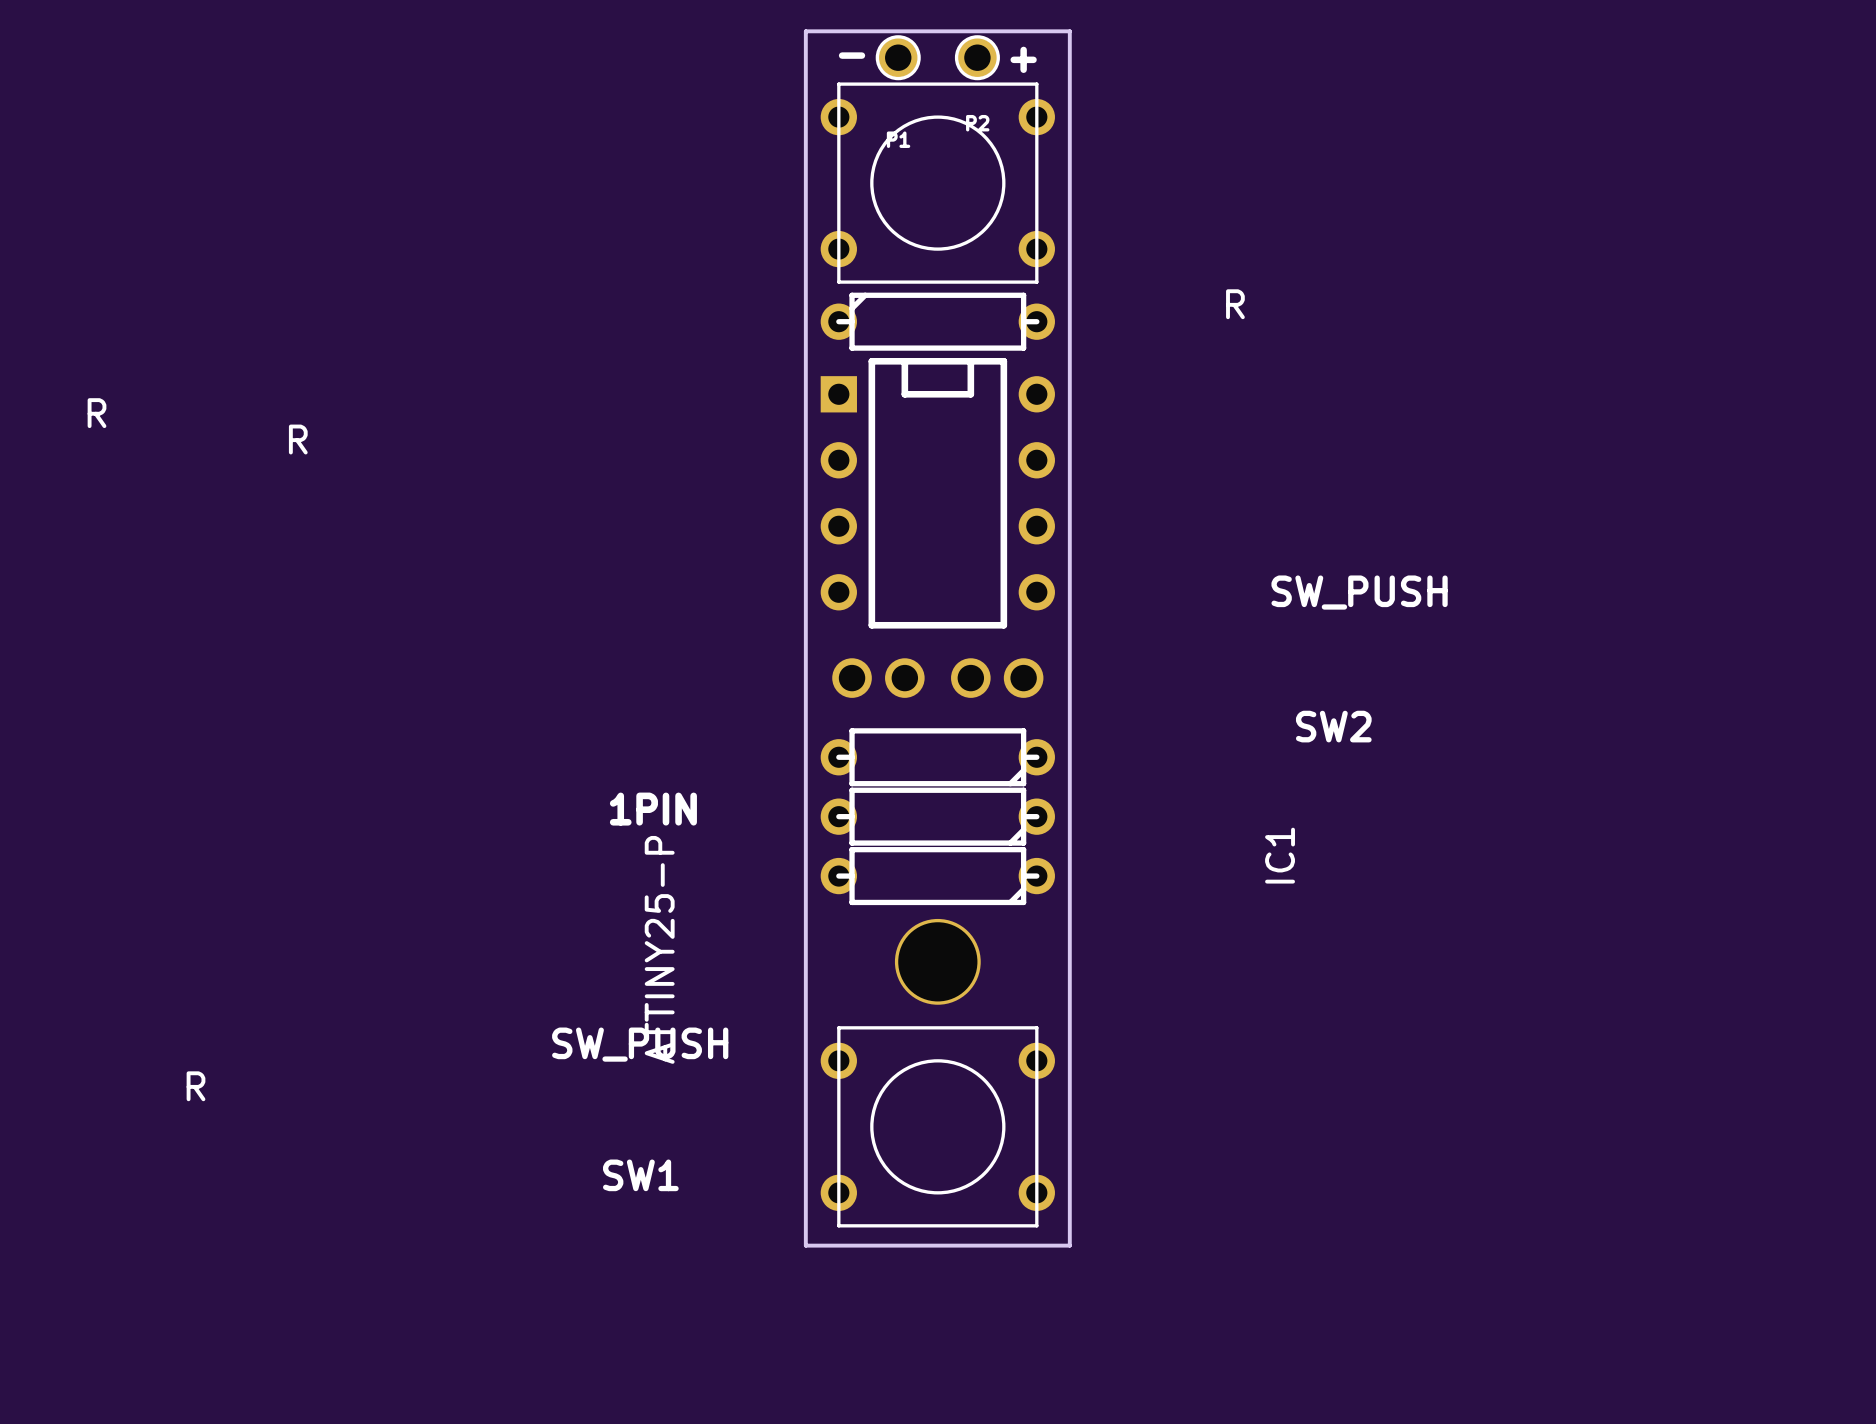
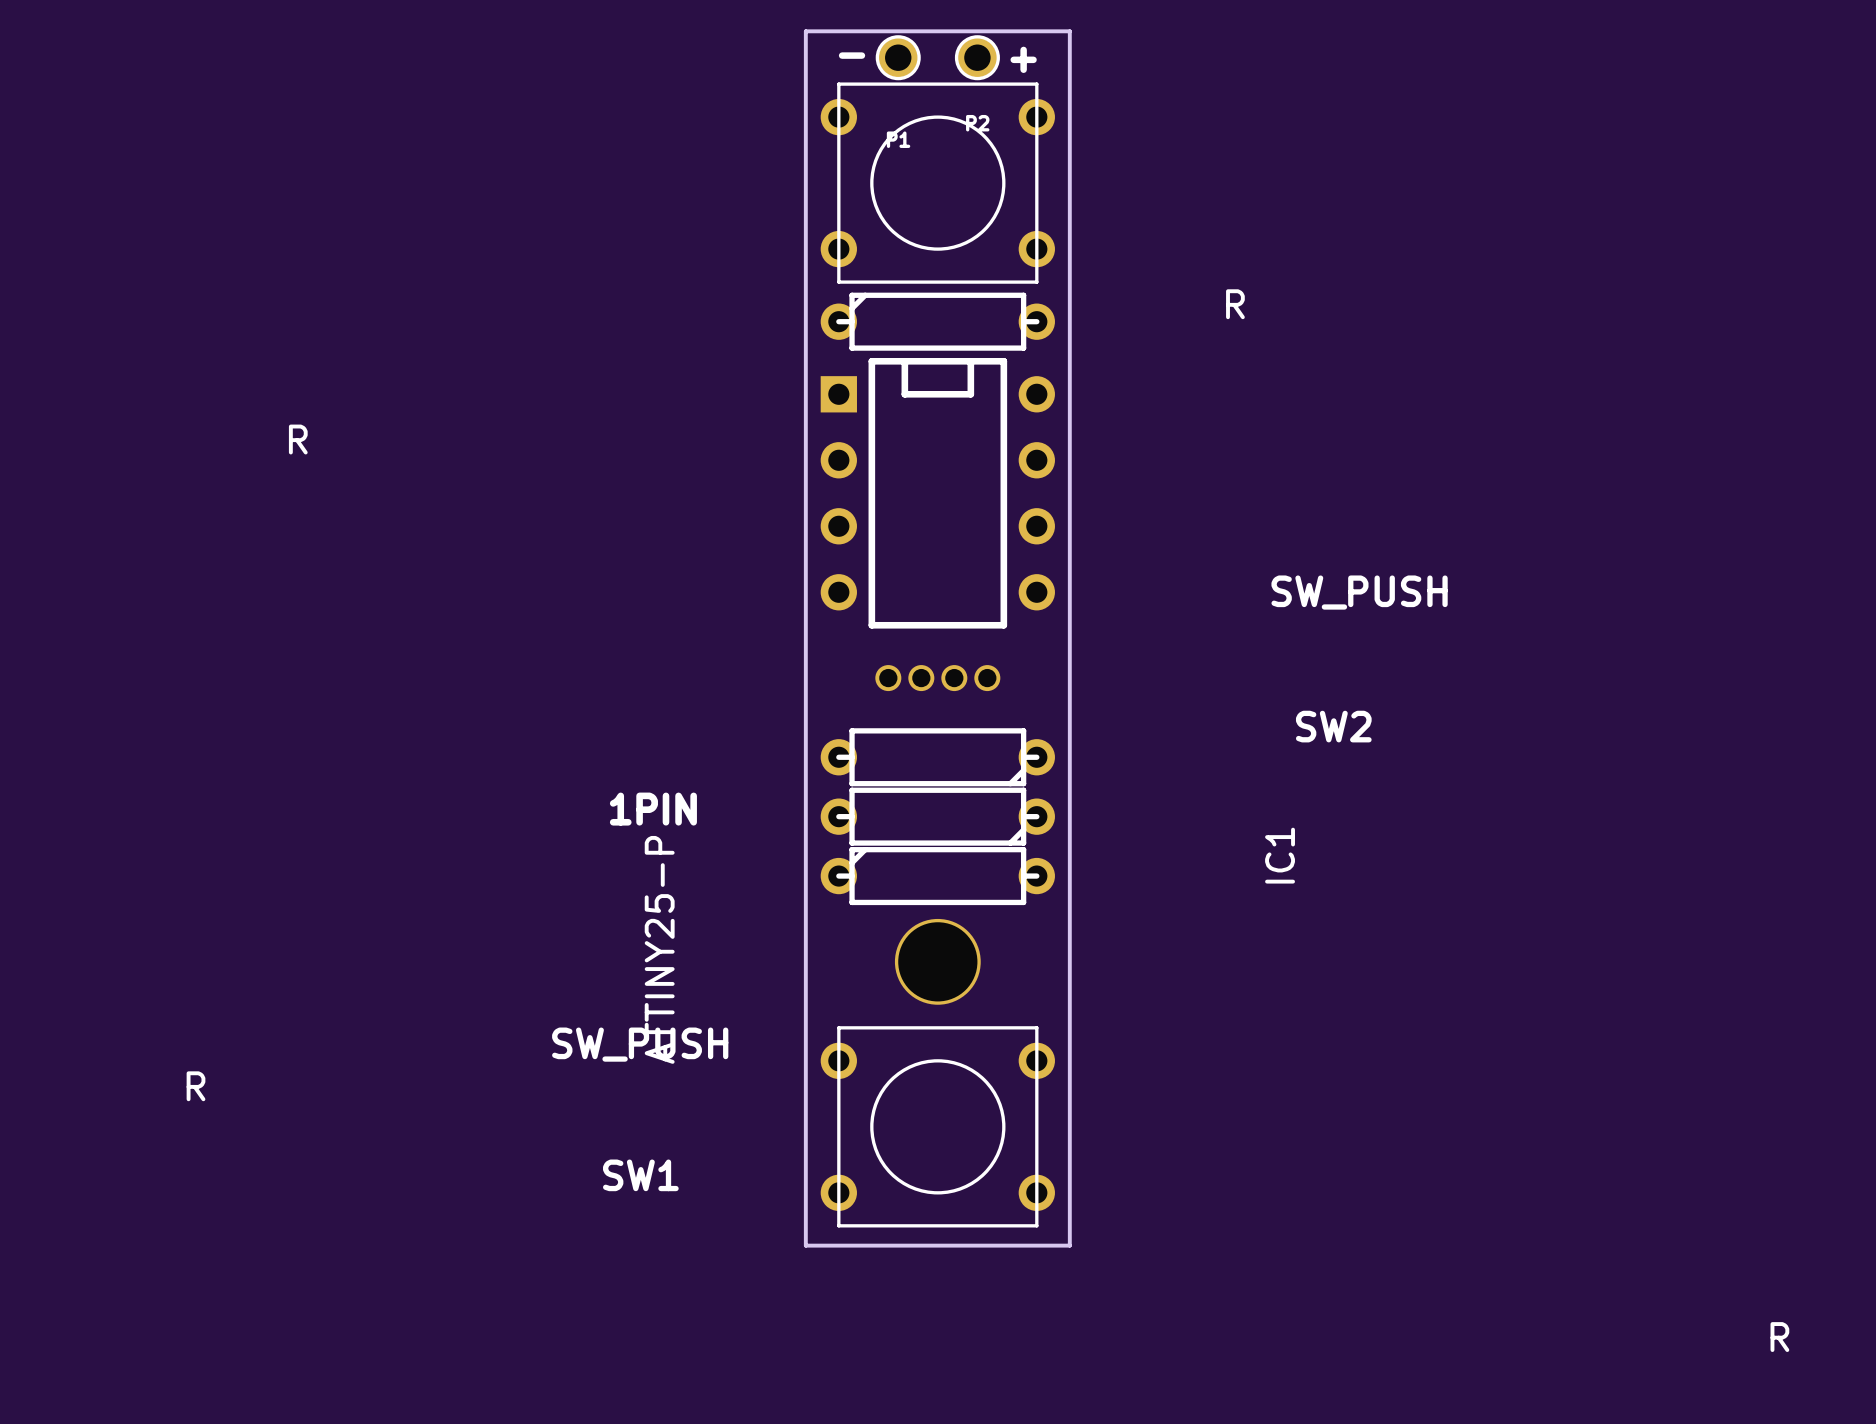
part footprint: [832, 658, 1044, 698] -> [875, 665, 1001, 692]
part rotation: 0° (937, 876) -> 180° (937, 876)

